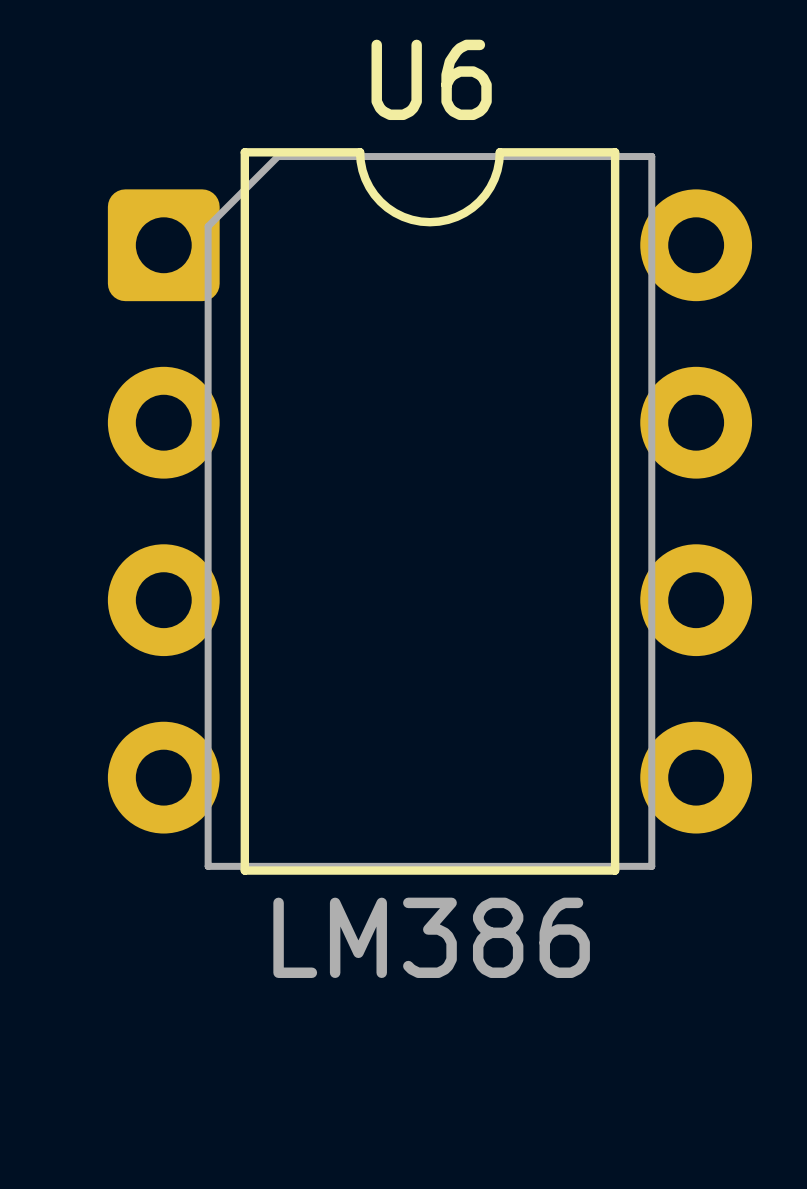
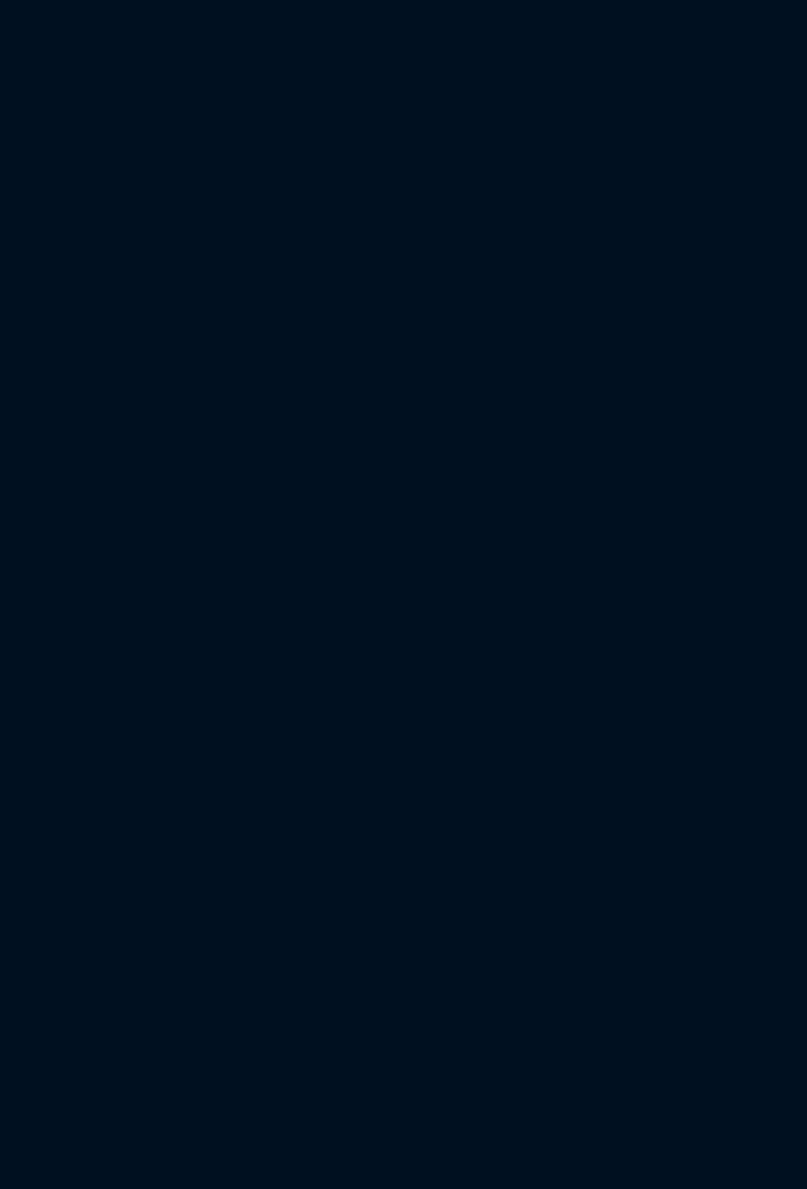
U6: LM386 (429, 511) -> none

